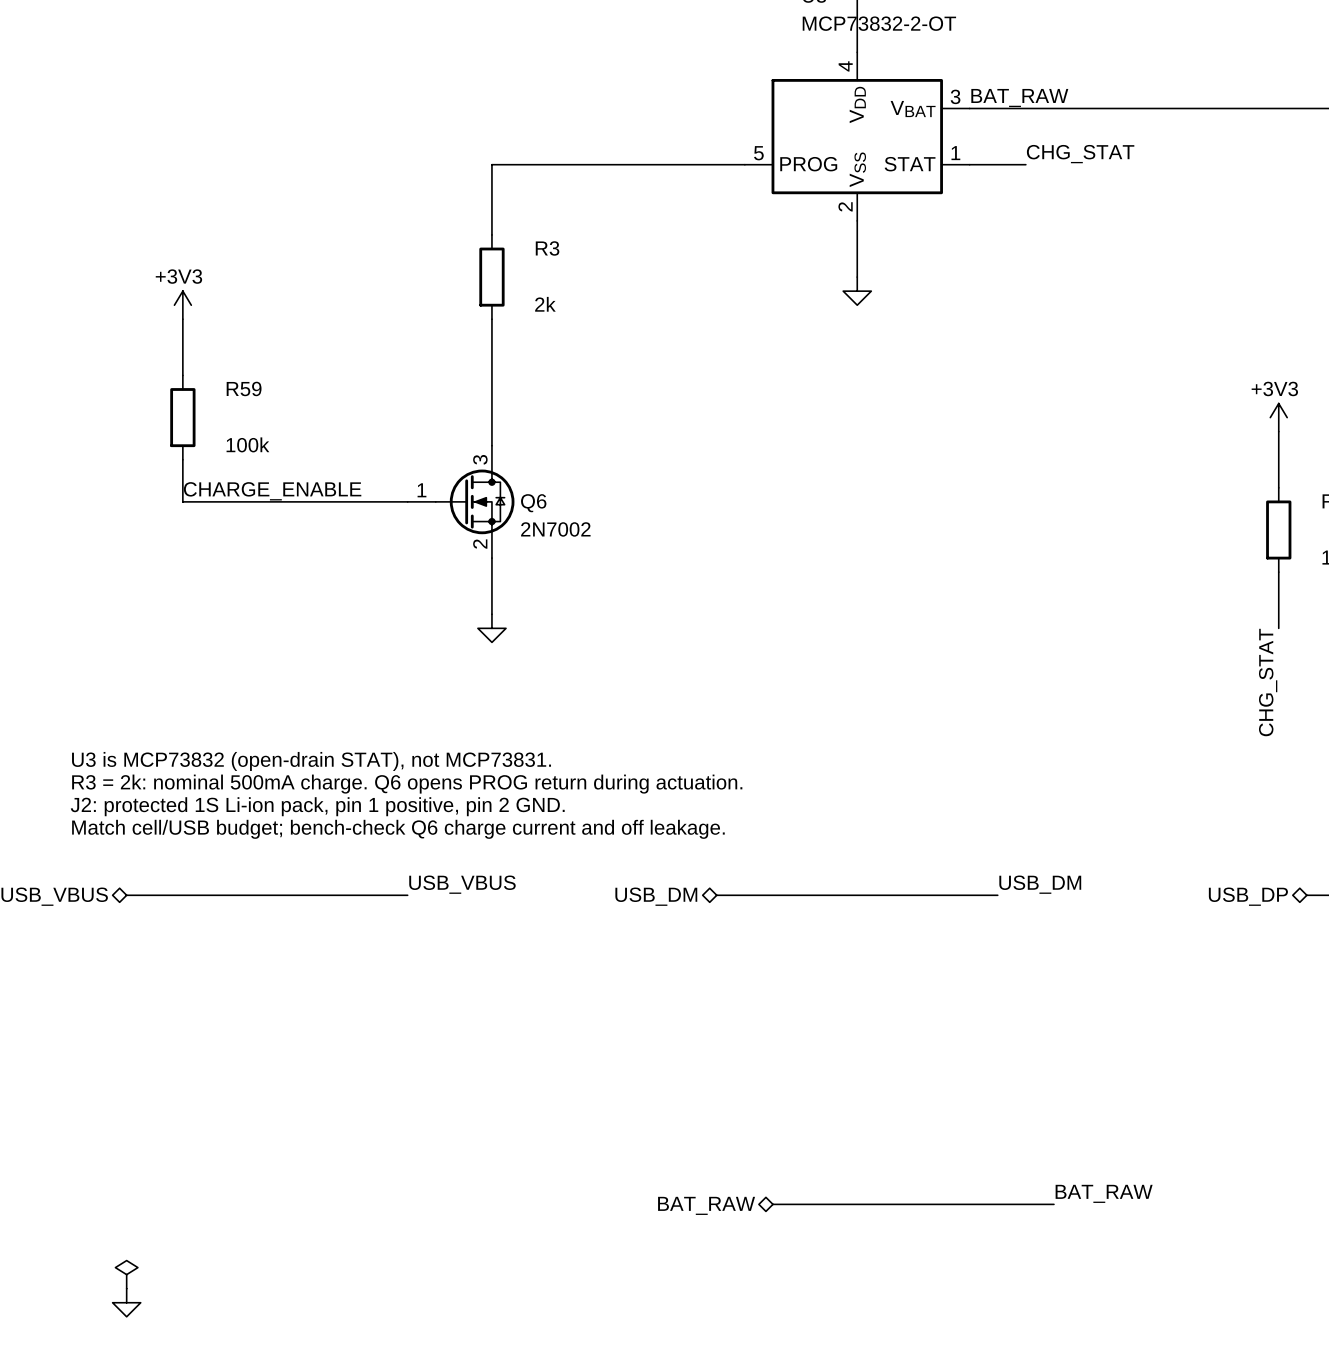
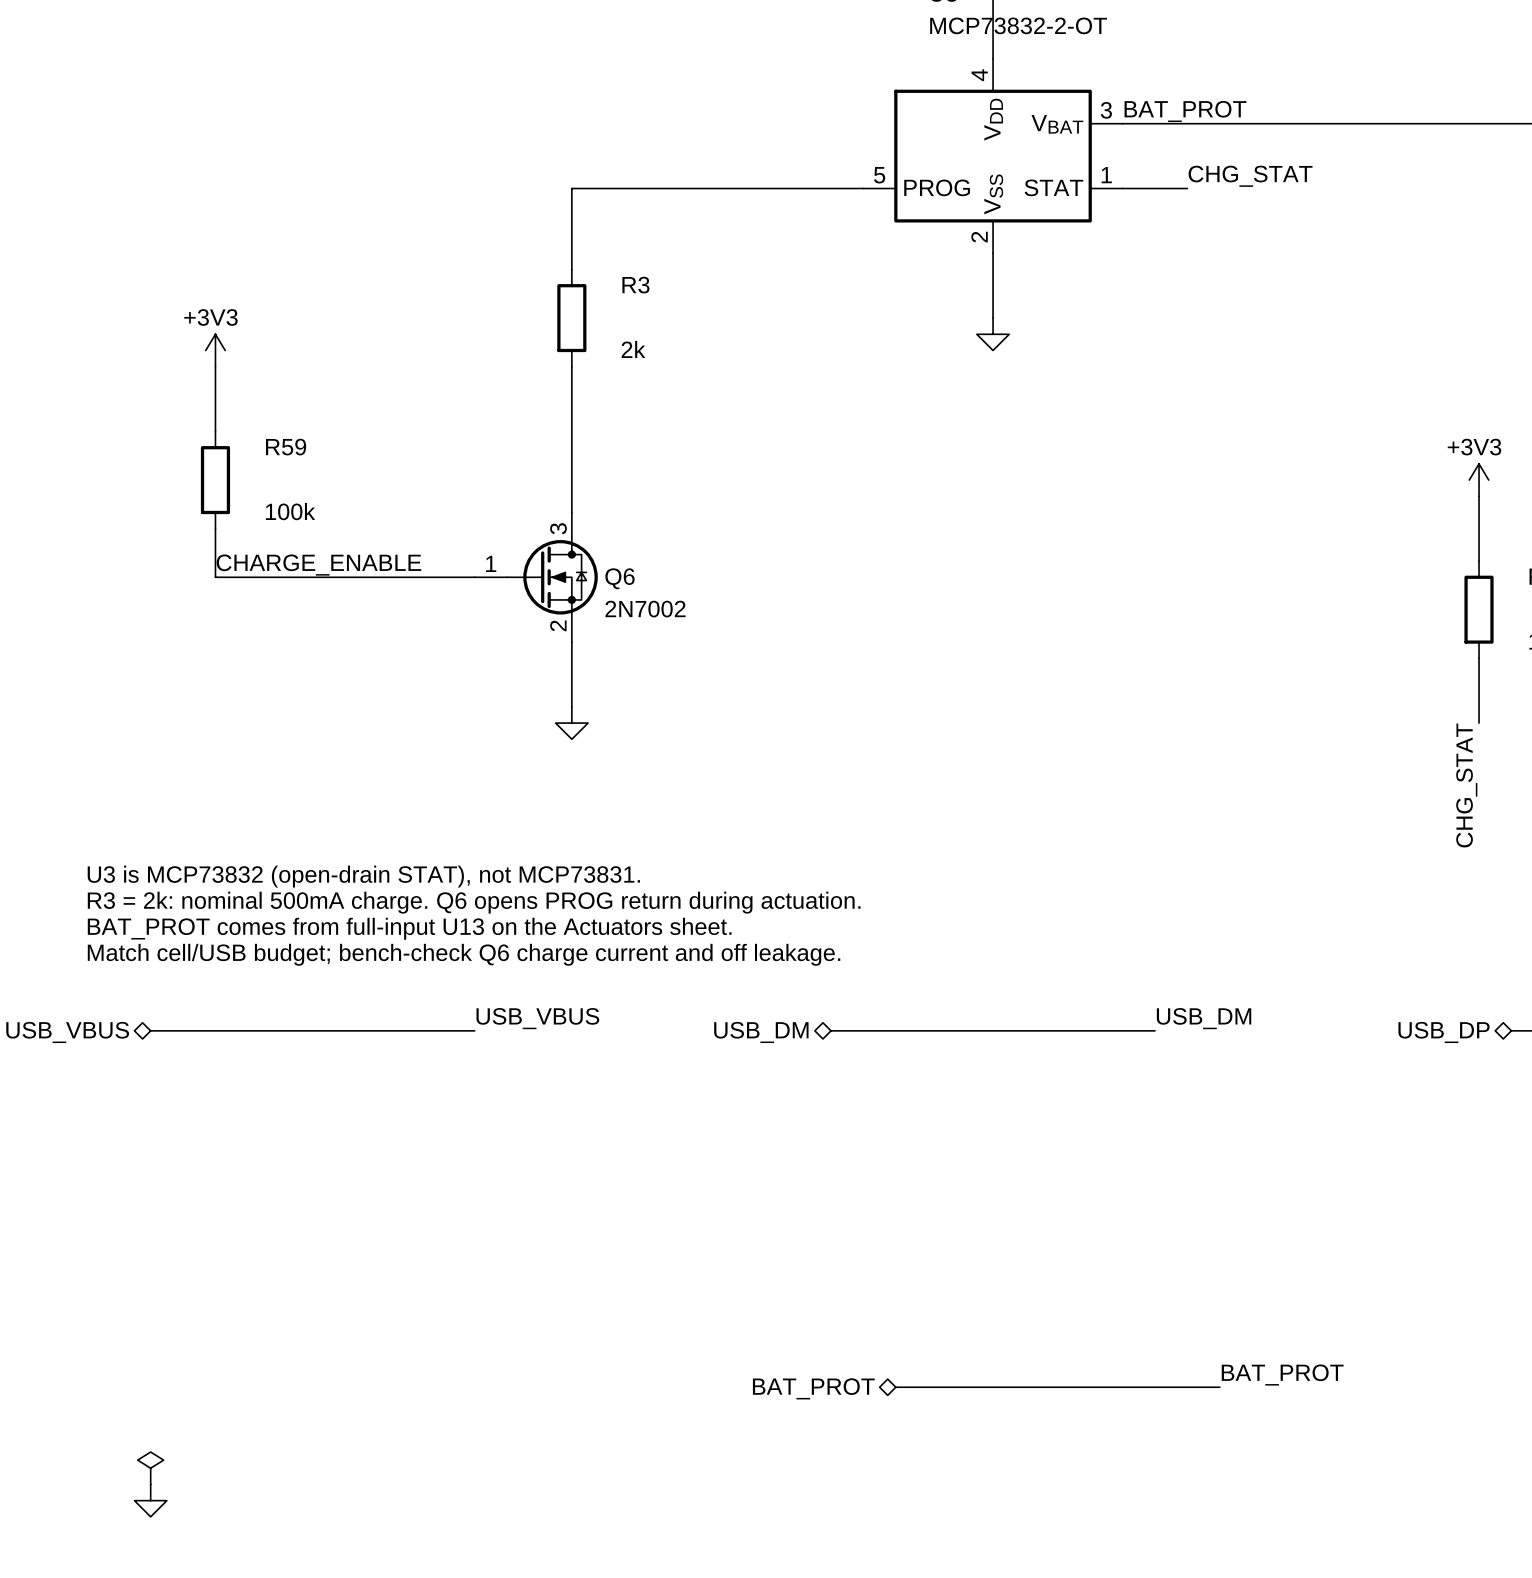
label: BAT_RAW (1019, 97) -> BAT_PROT (1185, 111)
text: J2: protected 1S Li-ion pack, pin 1 positive, pin 2 GND. (317, 806) -> BAT_PROT comes from full-input U13 on the Actuators sheet. (409, 928)
label: BAT_RAW (1104, 1193) -> BAT_PROT (1282, 1375)
hierarchical label: BAT_RAW (706, 1205) -> BAT_PROT (813, 1388)

